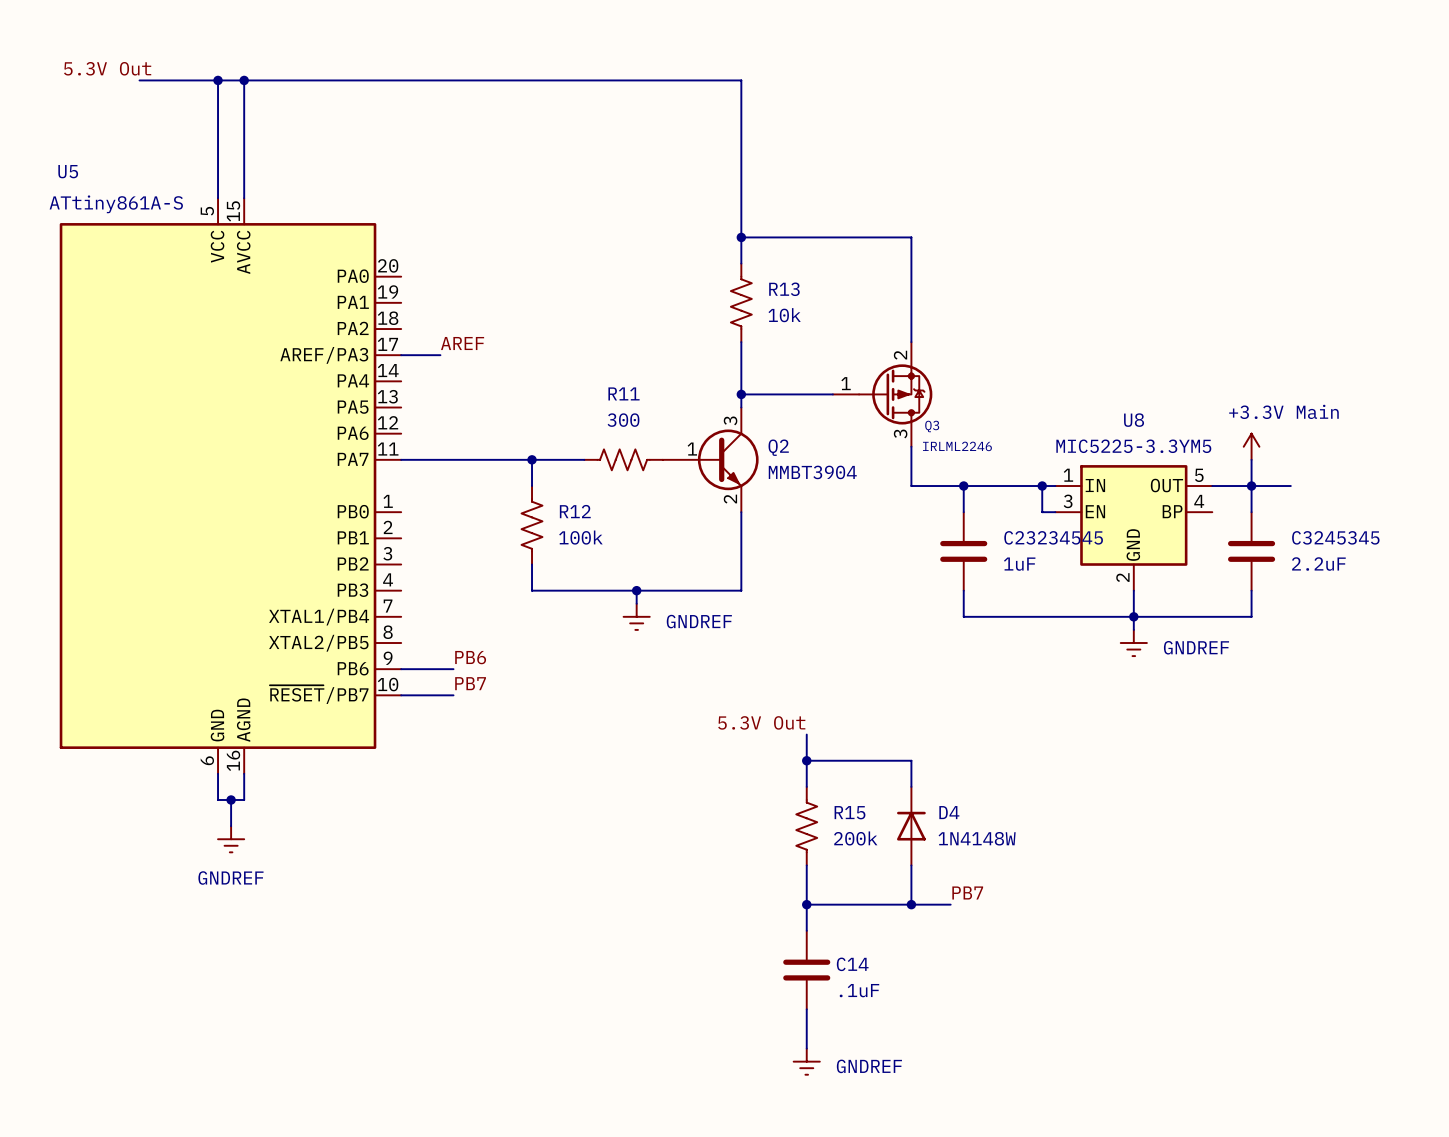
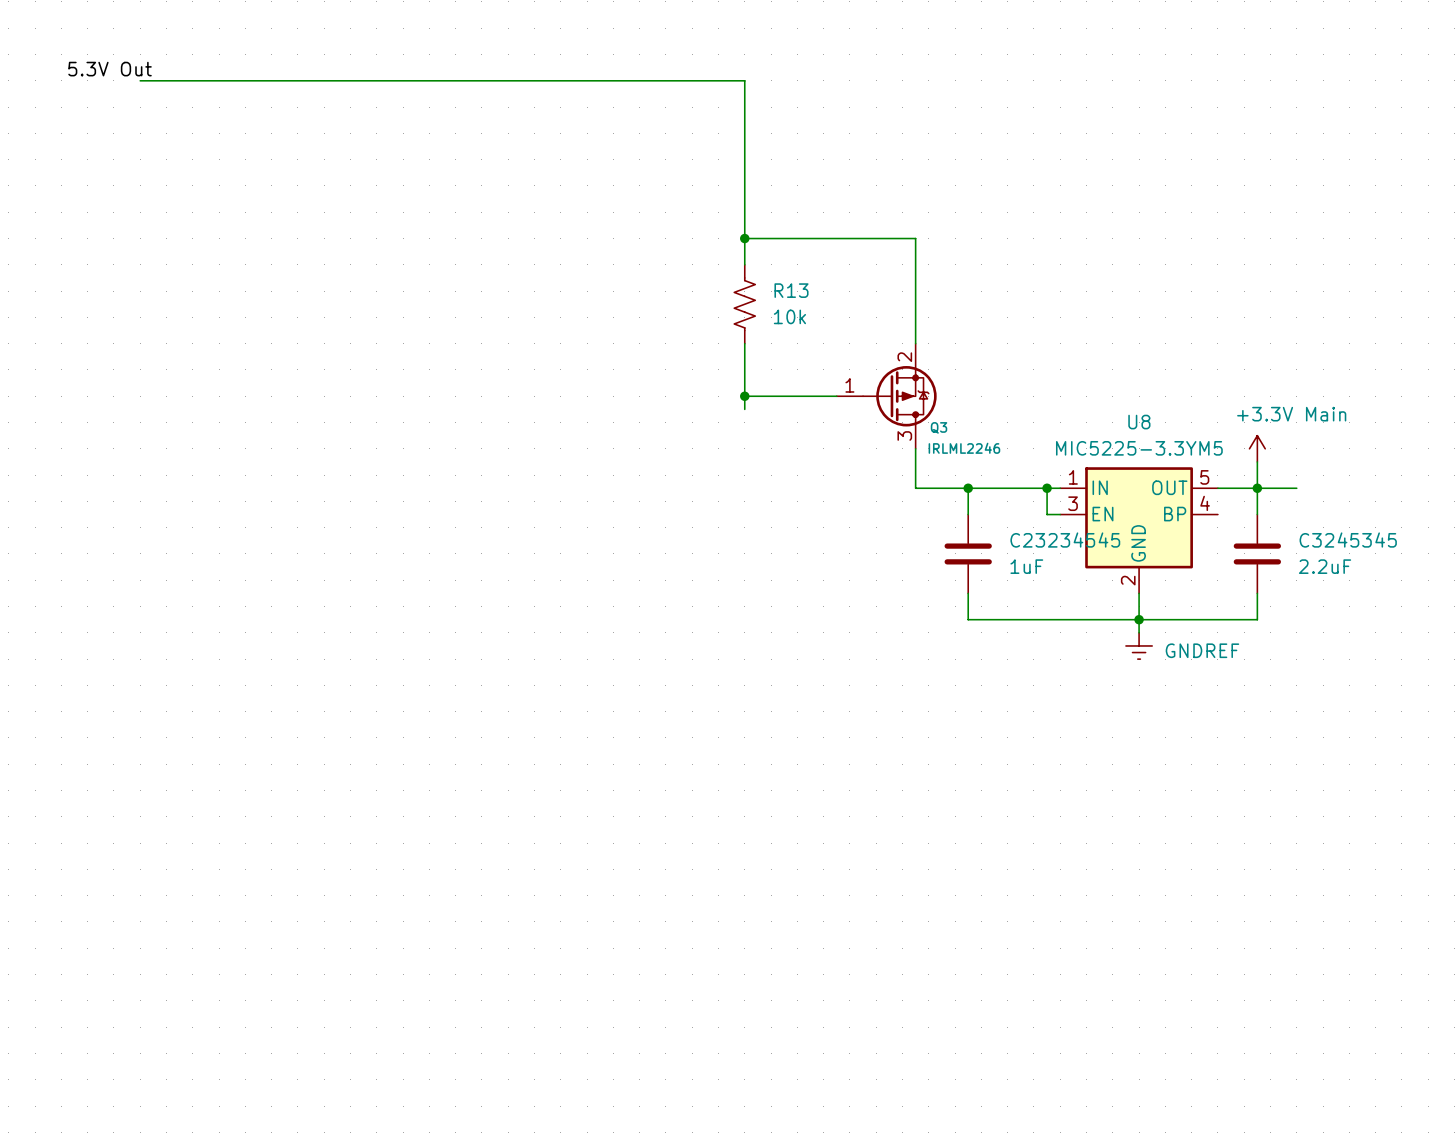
wire: (218, 80) (218, 198) -> none
junction: (218, 80) -> none
wire: (244, 80) (244, 198) -> none
junction: (244, 80) -> none
label: AREF (462, 343) -> none
wire: (401, 355) (440, 355) -> none
wire: (401, 459) (584, 459) -> none
wire: (532, 459) (532, 486) -> none
junction: (532, 459) -> none
R11: 300 (623, 459) -> none
Q2: MMBT3904 (710, 459) -> none
U5: ATtiny861A-S (230, 486) -> none
wire: (741, 512) (741, 590) (532, 590) (532, 564) -> none
R12: 100k (532, 525) -> none
wire: (636, 590) (636, 603) -> none
junction: (636, 590) -> none
power symbol: GNDREF (636, 616) -> none
label: PB6 (470, 657) -> none
wire: (401, 669) (453, 669) -> none
label: PB7 (470, 683) -> none
wire: (401, 695) (453, 695) -> none
label: 5.3V Out (761, 722) -> none
wire: (806, 734) (806, 786) -> none
wire: (806, 760) (911, 760) (911, 786) -> none
junction: (806, 760) -> none
wire: (218, 773) (218, 799) (244, 799) (244, 773) -> none
wire: (231, 799) (231, 826) -> none
junction: (231, 799) -> none
R15: 200k (806, 826) -> none
D4: 1N4148W (911, 826) -> none
power symbol: GNDREF (231, 839) -> none
wire: (806, 865) (806, 930) -> none
wire: (911, 865) (911, 904) -> none
label: PB7 (967, 892) -> none
wire: (806, 904) (950, 904) -> none
junction: (806, 904) -> none
junction: (911, 904) -> none
C14: .1uF (806, 970) -> none
wire: (806, 1009) (806, 1048) -> none
power symbol: GNDREF (806, 1061) -> none

